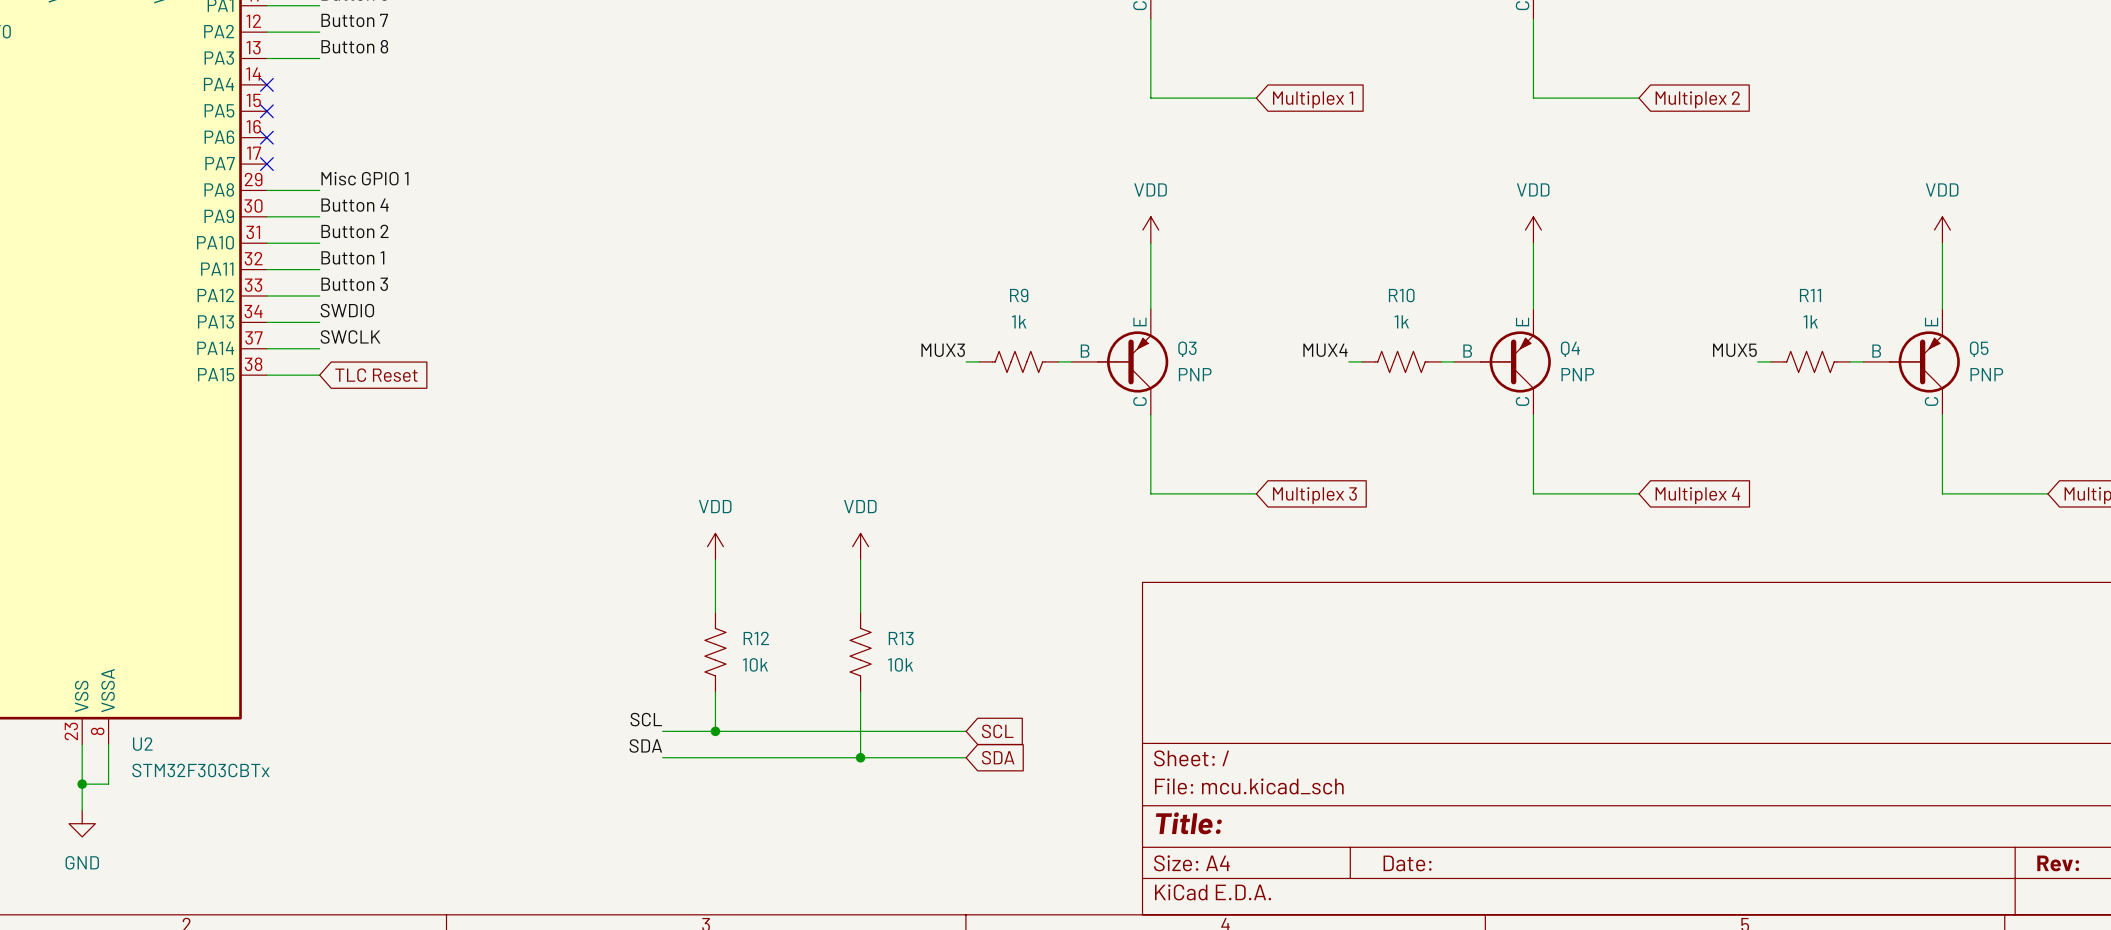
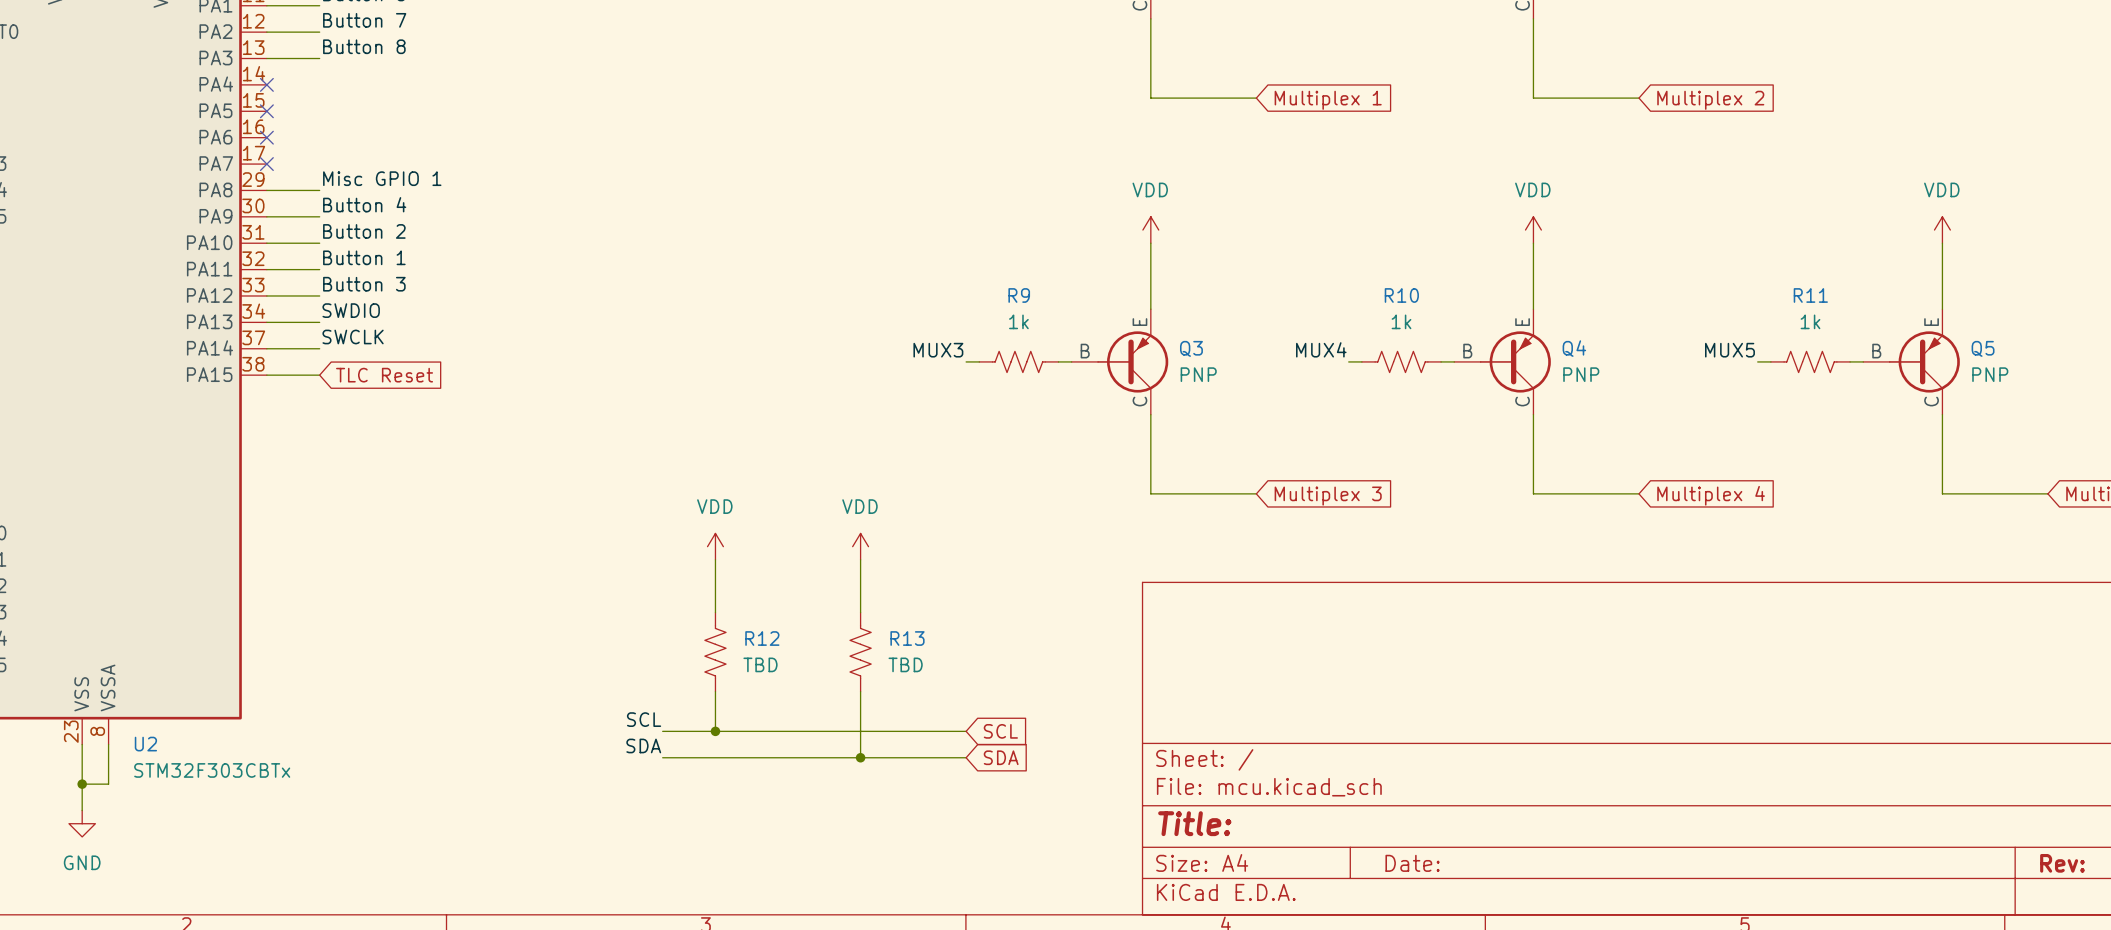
R12 value: 10k (755, 664) -> TBD (760, 664)
R13 value: 10k (900, 664) -> TBD (905, 664)

